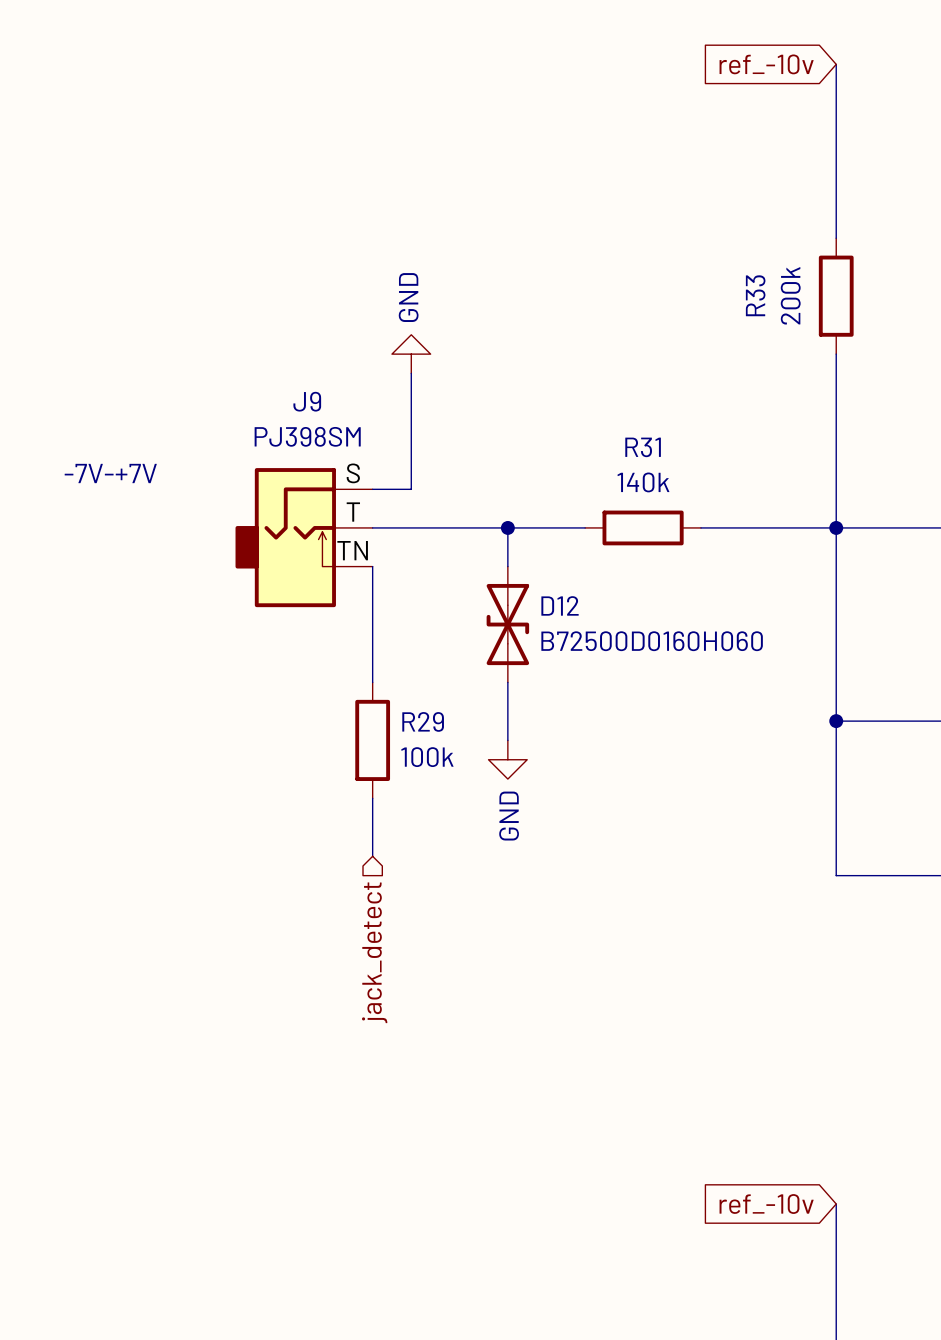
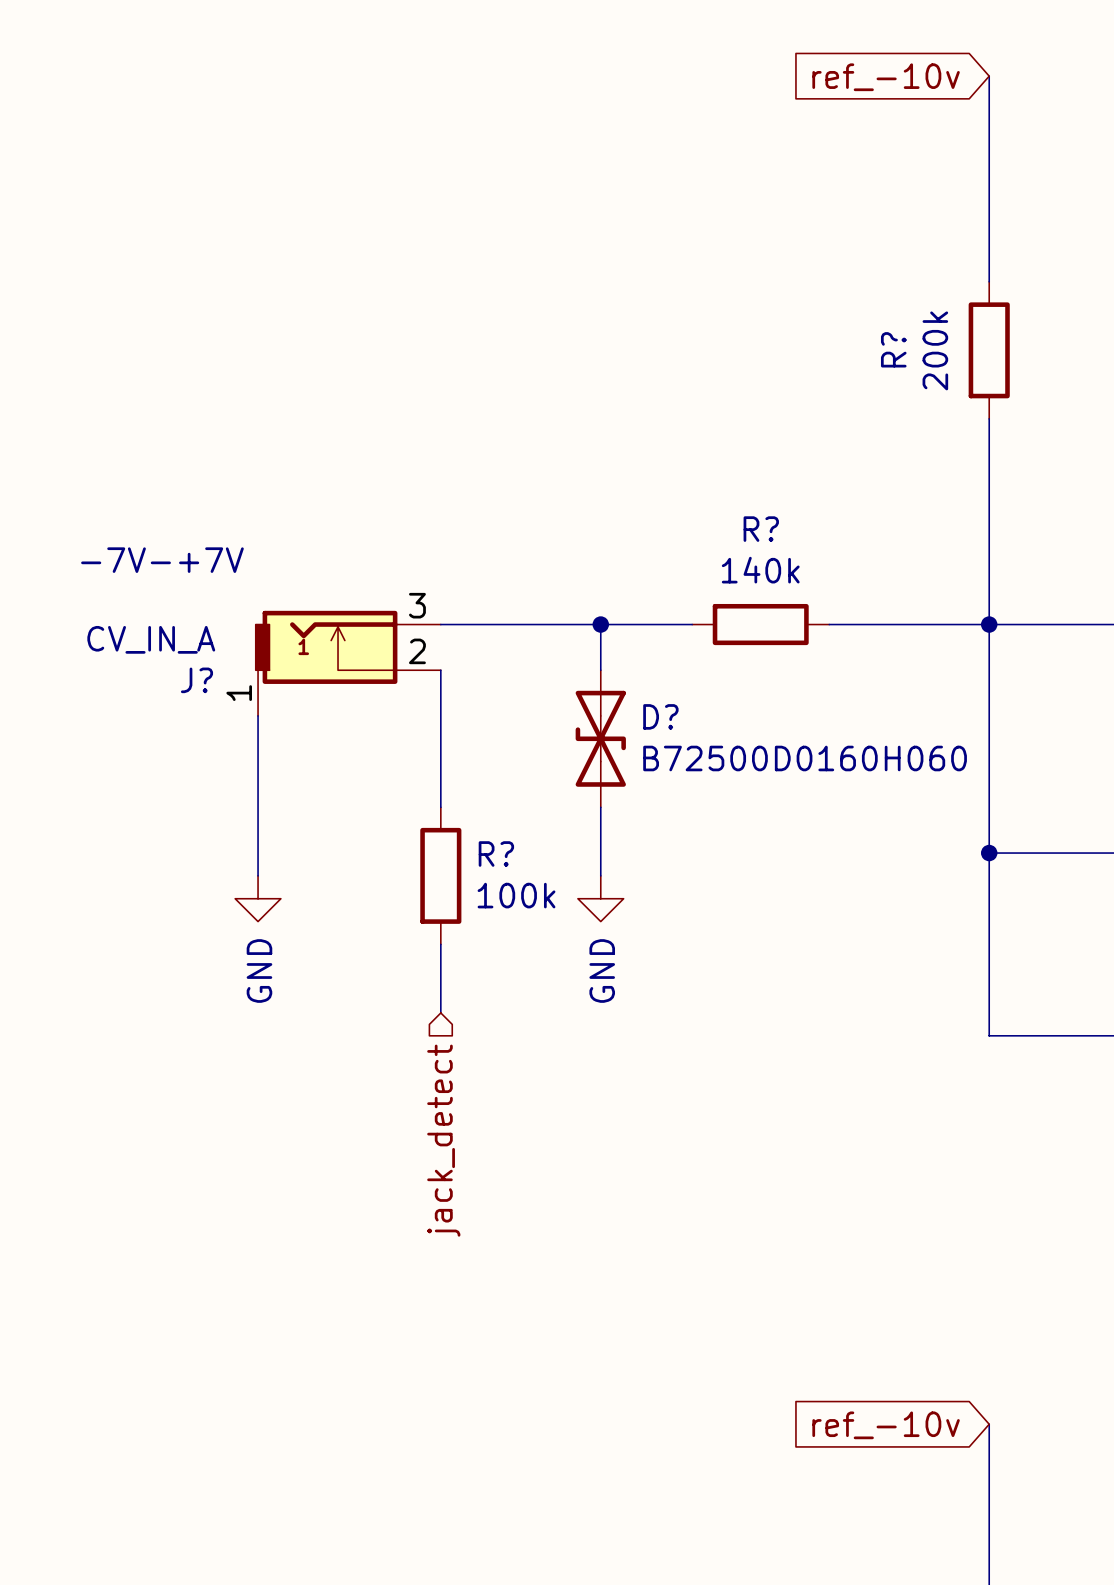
R33 name: R33 (755, 295) -> R? (893, 349)
power symbol: GND (411, 354) -> none
wire: (411, 373) (411, 489) (372, 489) -> none
R31 name: R31 (643, 447) -> R? (761, 529)
J9: PJ398SM (304, 537) -> none
J?: none -> CV_IN_A (348, 663)
wire: none -> (258, 715) (258, 875)
D12 name: D12 (560, 605) -> D? (660, 716)
R29 name: R29 (423, 721) -> R? (496, 854)
power symbol: none -> GND (258, 898)

